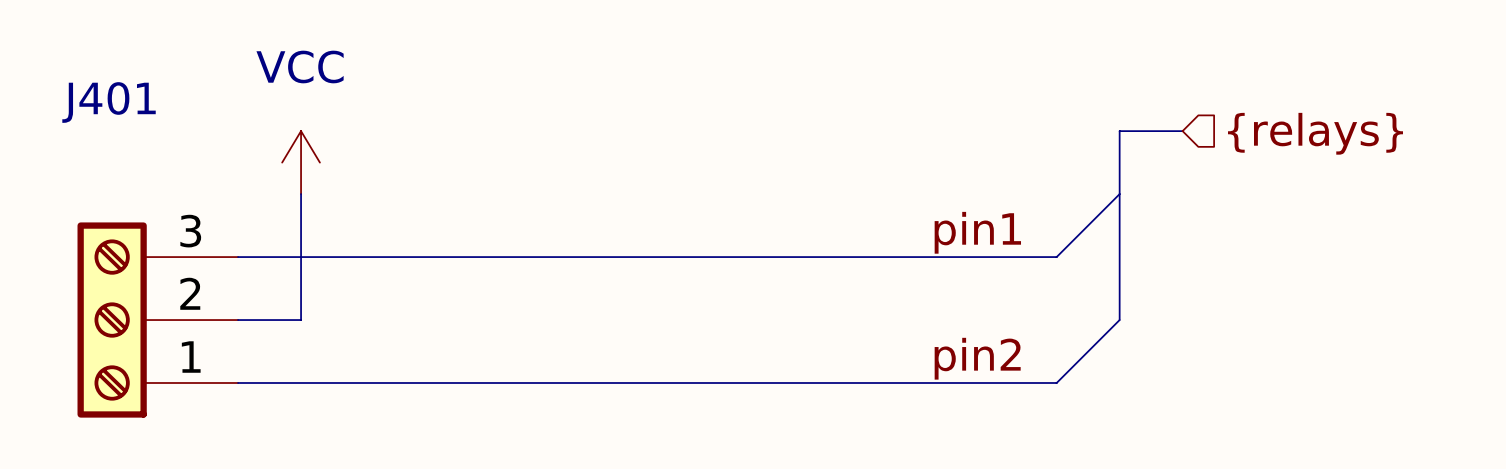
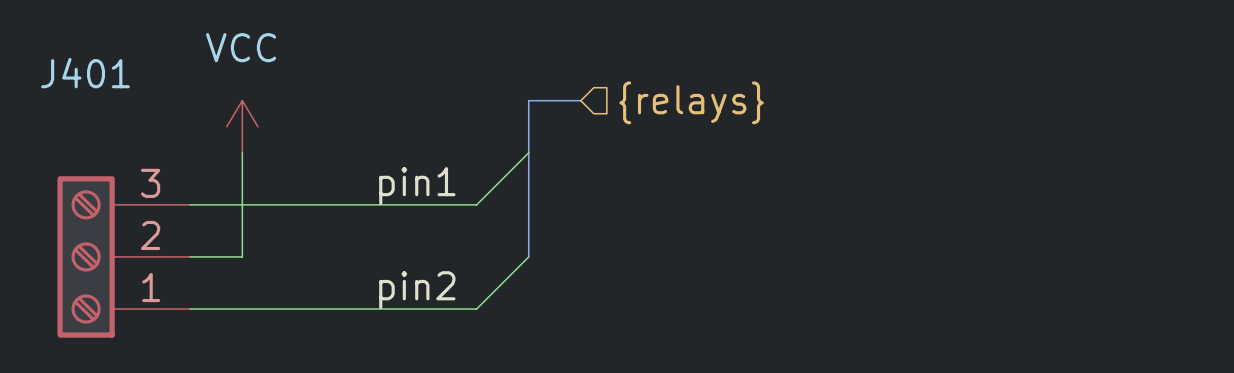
bus: (1182, 131) (1119, 131) (1119, 320) -> (580, 100) (528, 100) (528, 256)
hierarchical label position: {relays} (1315, 133) -> {relays} (691, 102)
wire: (1119, 194) (1056, 257) (584, 257) -> (528, 152) (476, 204)
label position: pin1 (977, 232) -> pin1 (417, 185)
wire: (1119, 320) (1056, 382) (584, 382) -> (528, 256) (476, 309)
label position: pin2 (977, 358) -> pin2 (417, 290)

